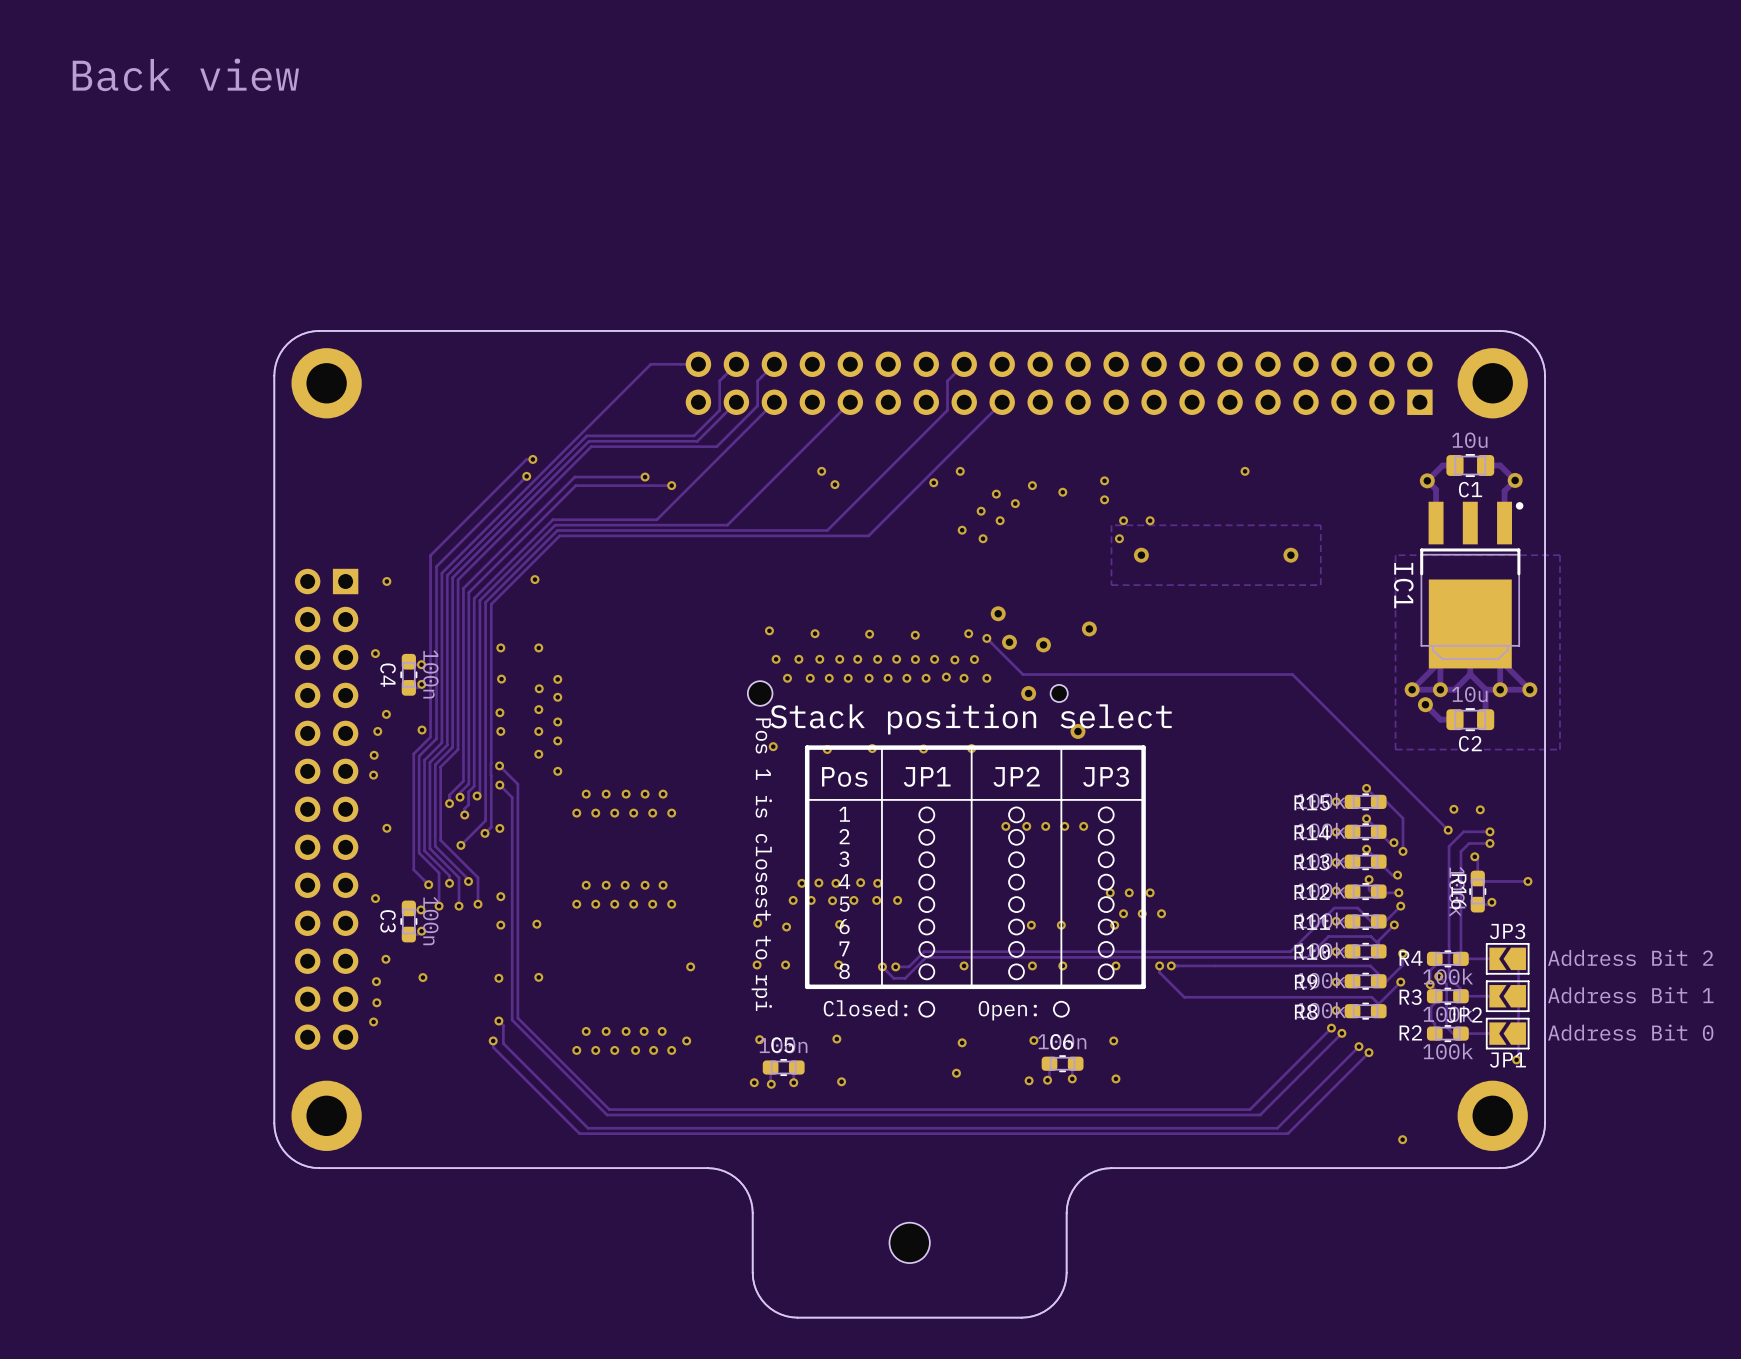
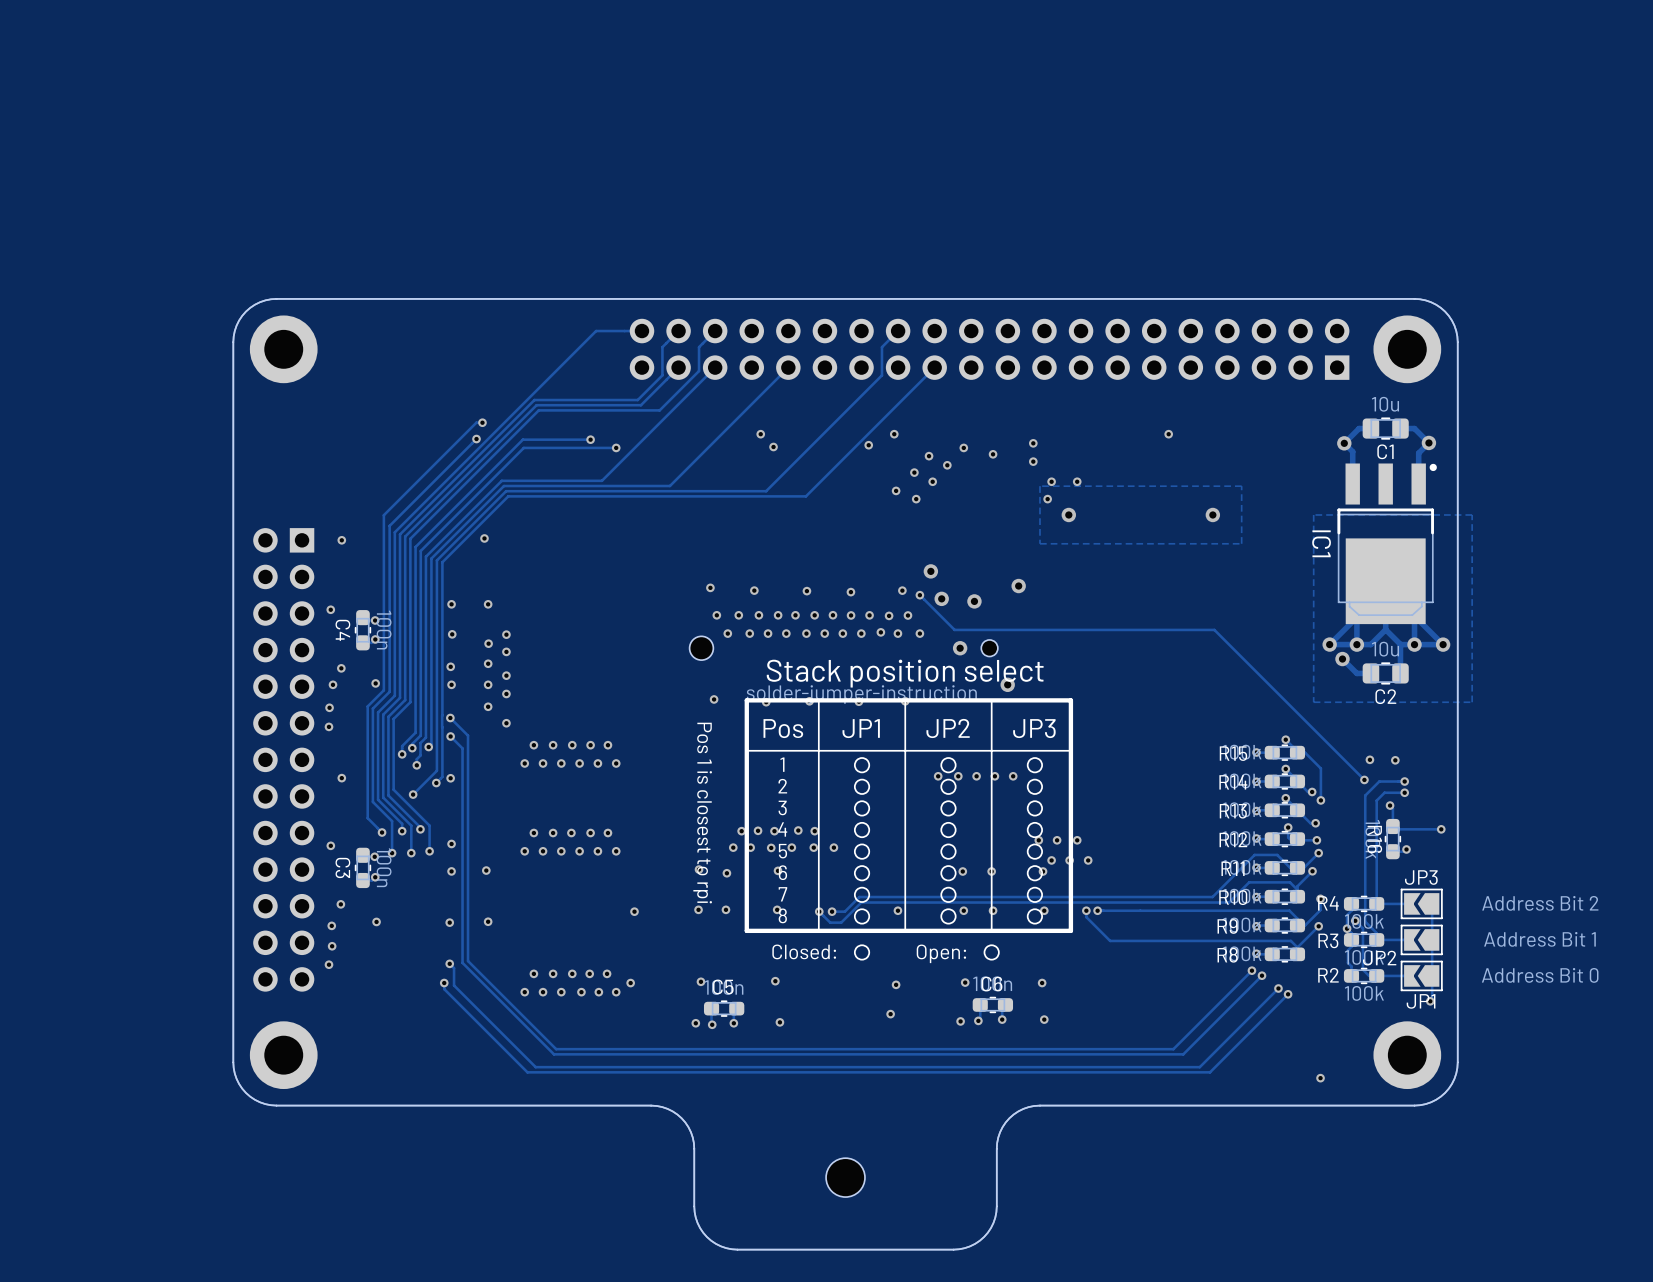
text: Back view (185, 74) -> none
drawing shape: [751, 704, 1172, 1021] -> [693, 659, 1074, 964]

